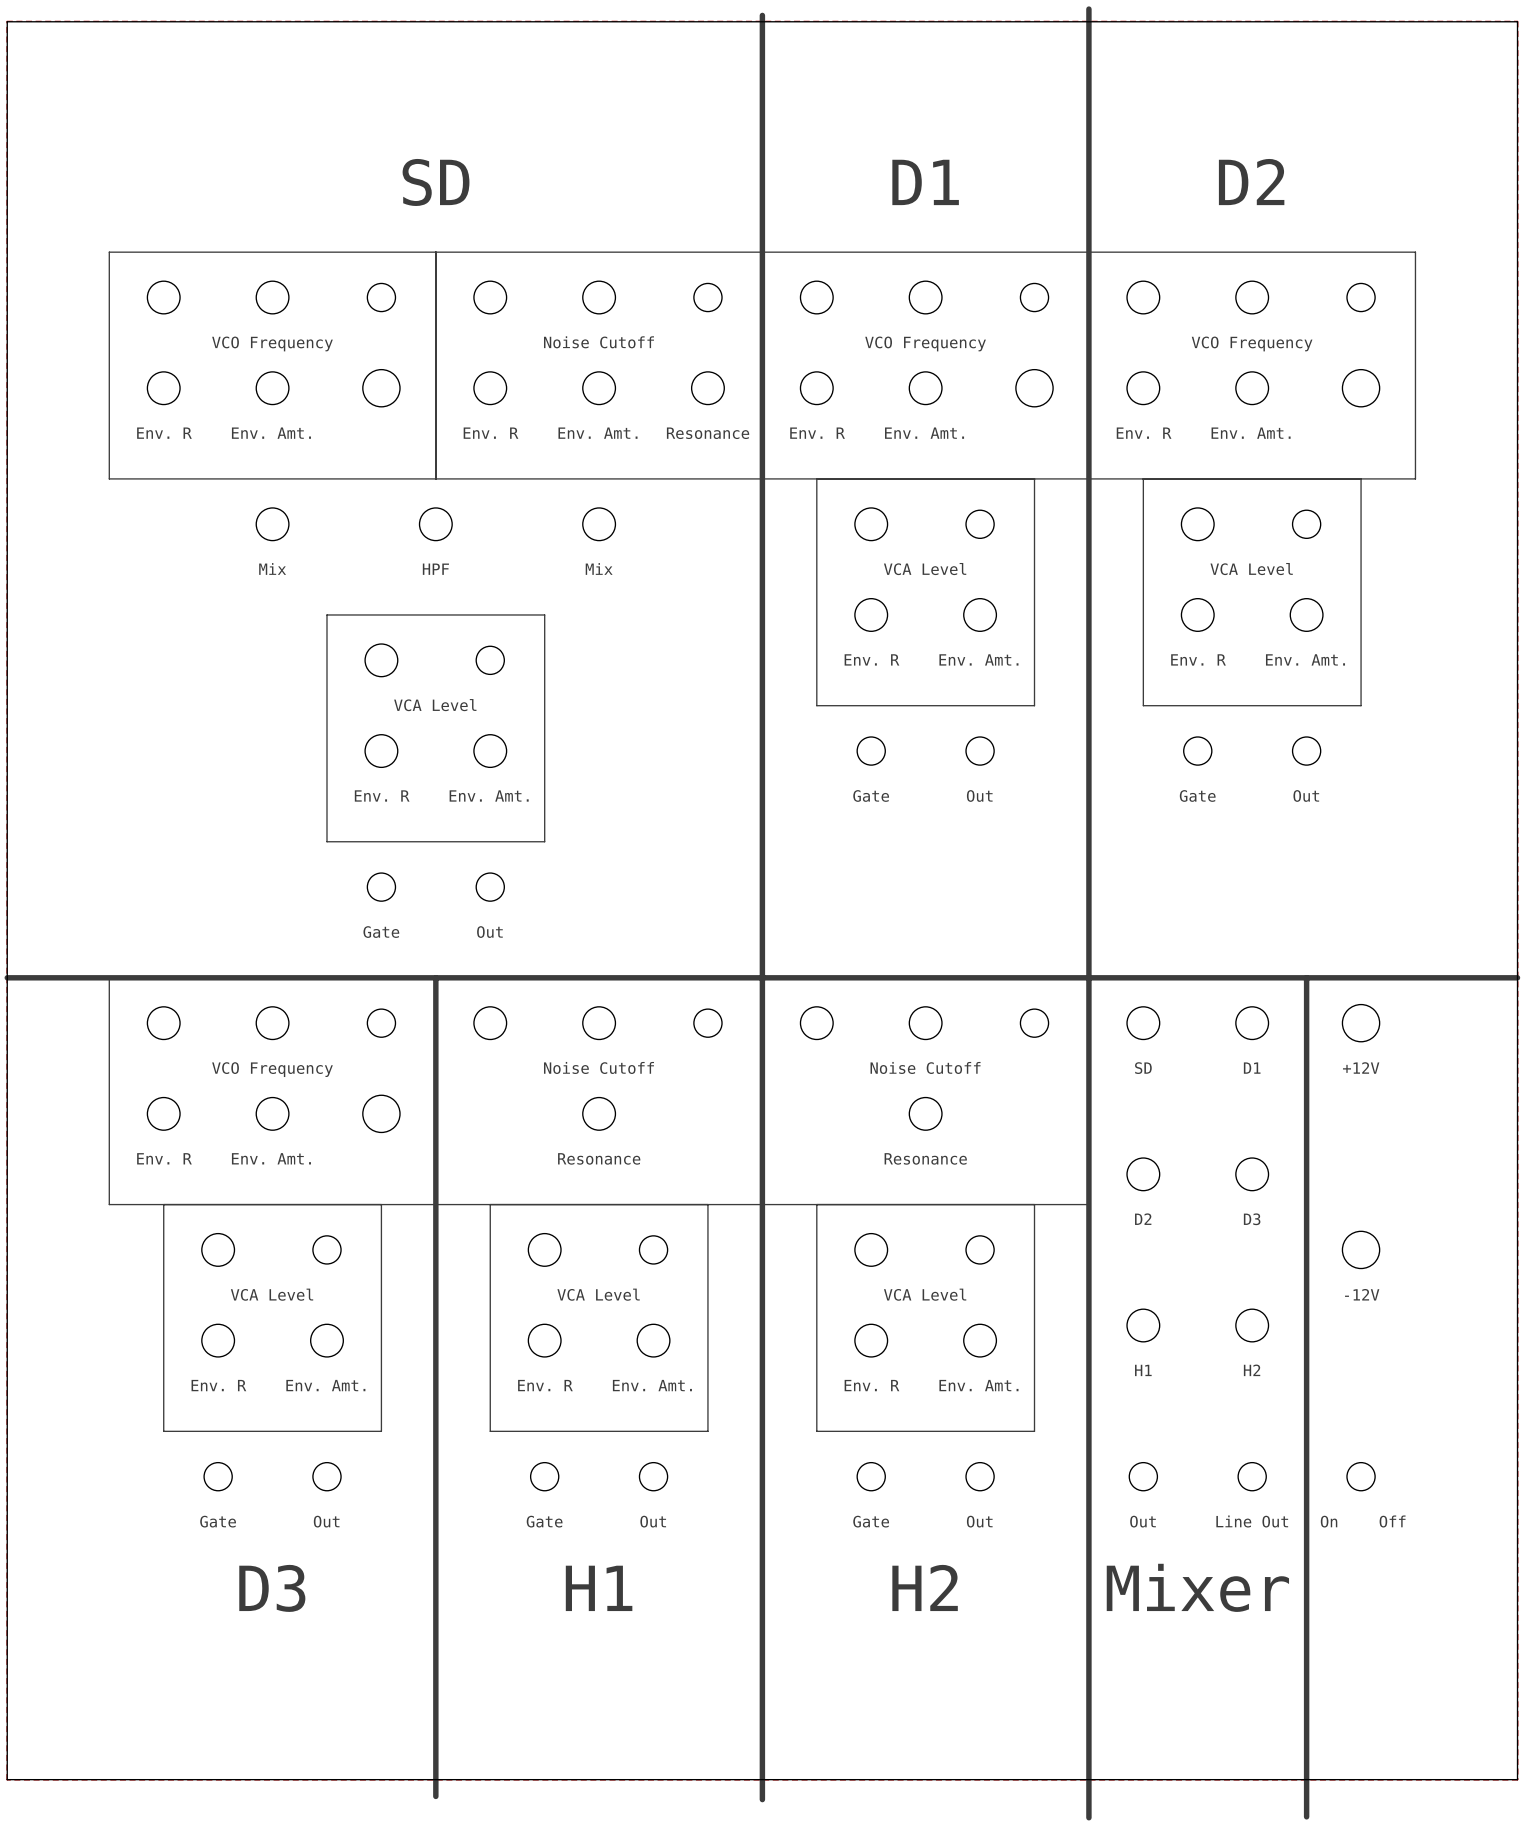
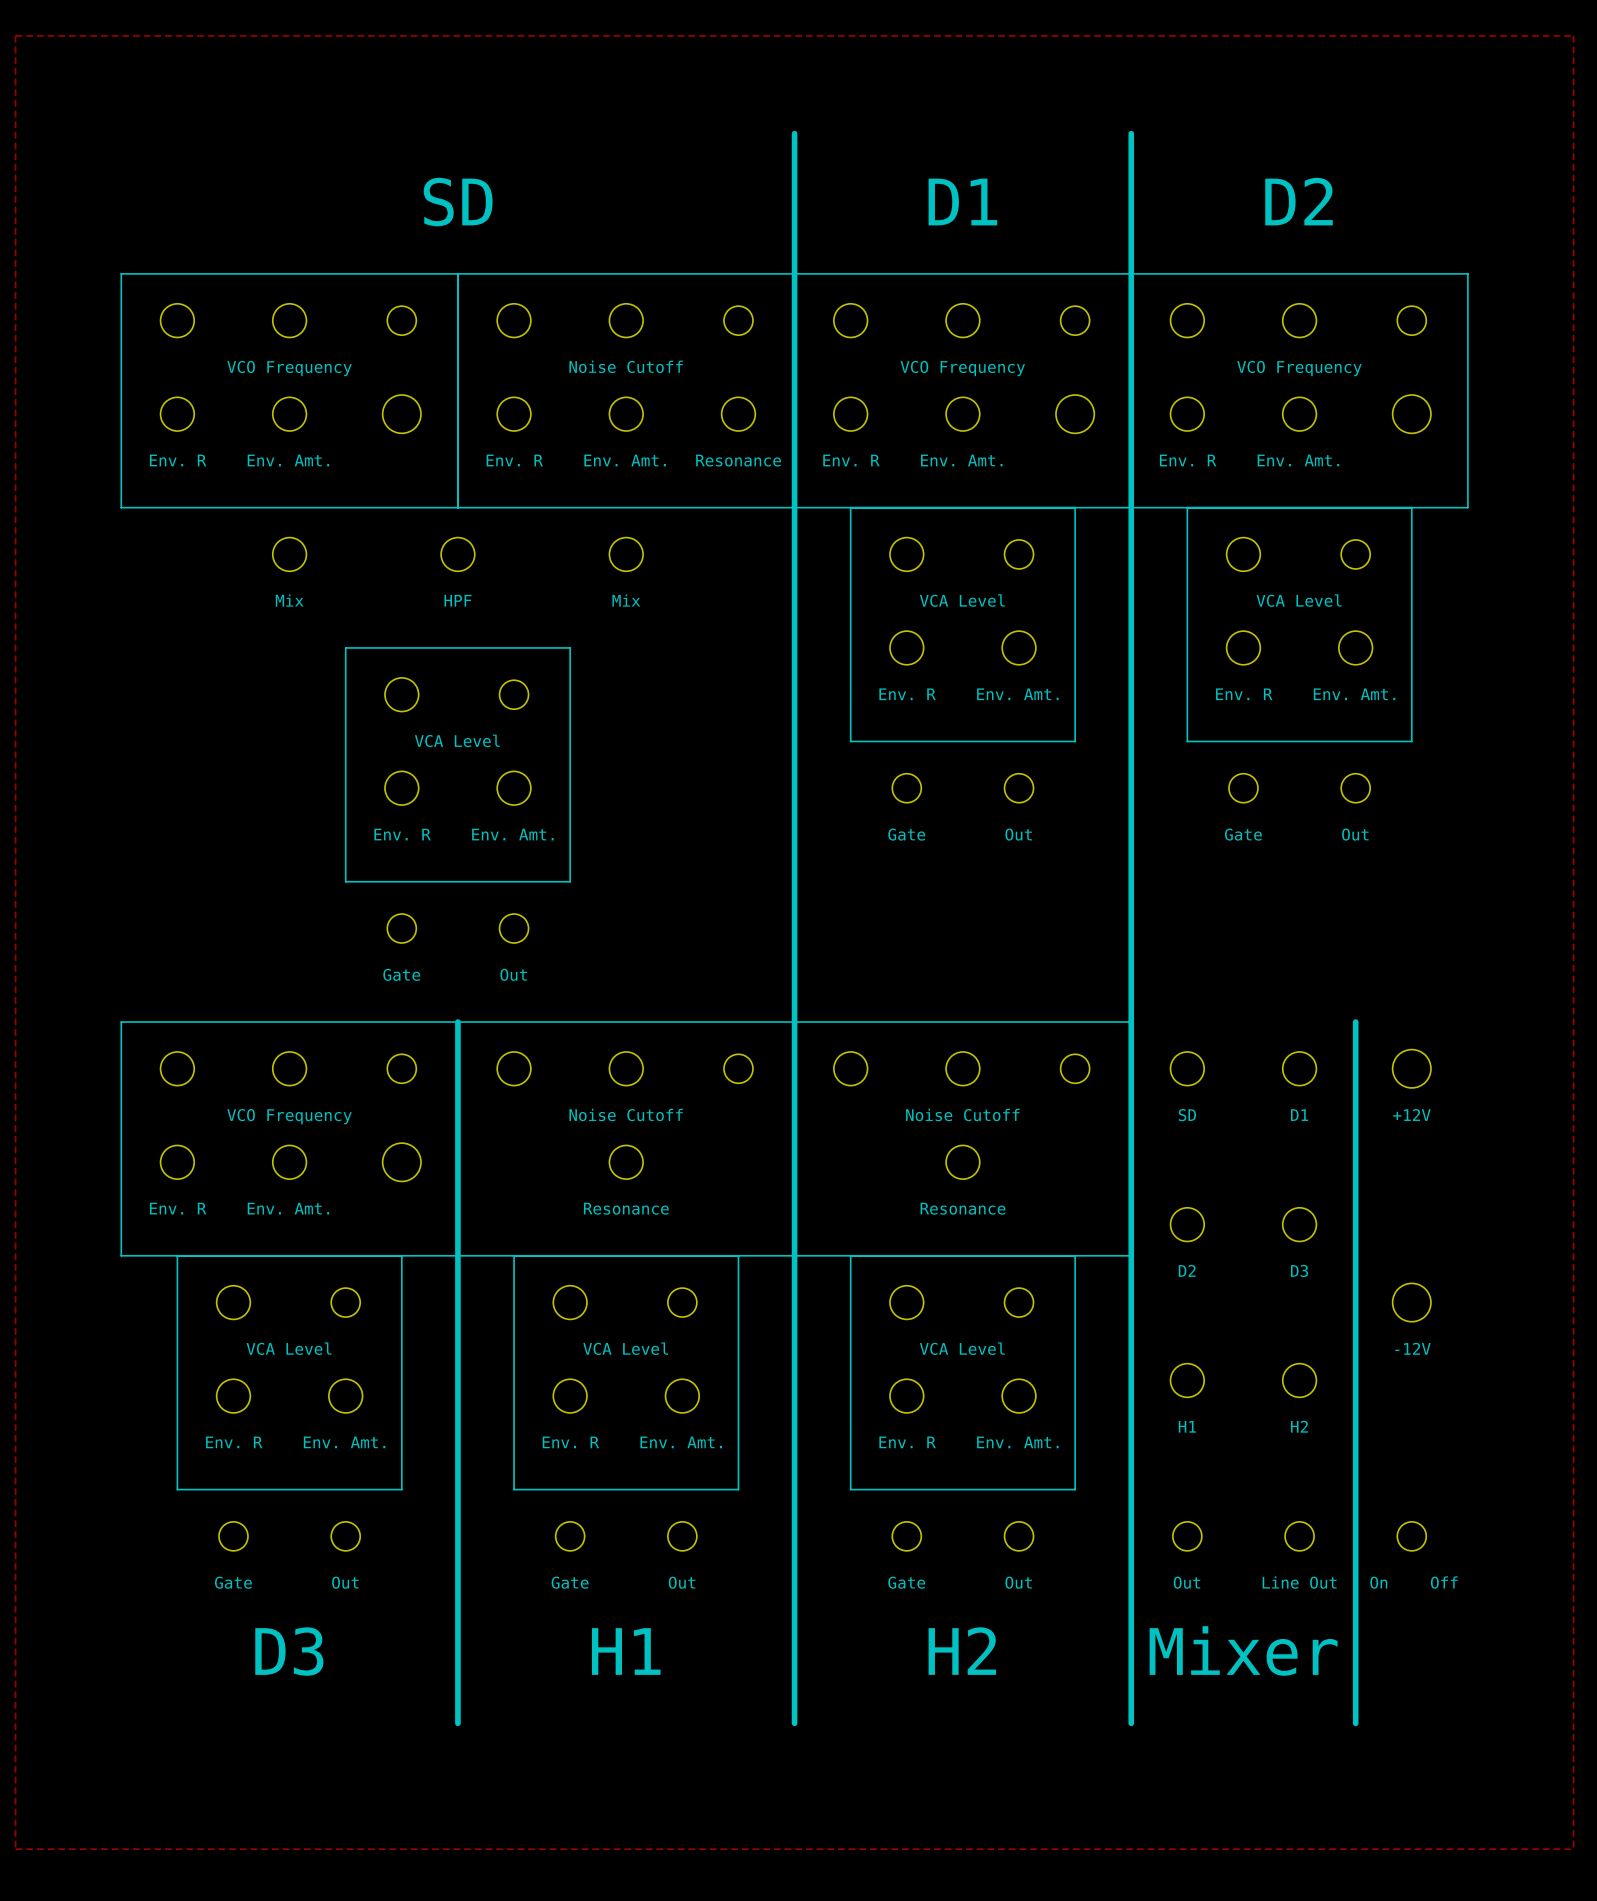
line: (1088, 9) (1088, 116) -> none
line: (762, 15) (762, 116) -> none
board edge: (7, 21) (1517, 21) (1517, 1779) (7, 1779) (7, 21) -> none
line: (7, 977) (1517, 977) -> none
line: (435, 1658) (435, 1796) -> none
line: (762, 1658) (762, 1799) -> none
line: (1088, 1658) (1088, 1817) -> none
line: (1306, 1658) (1306, 1816) -> none

